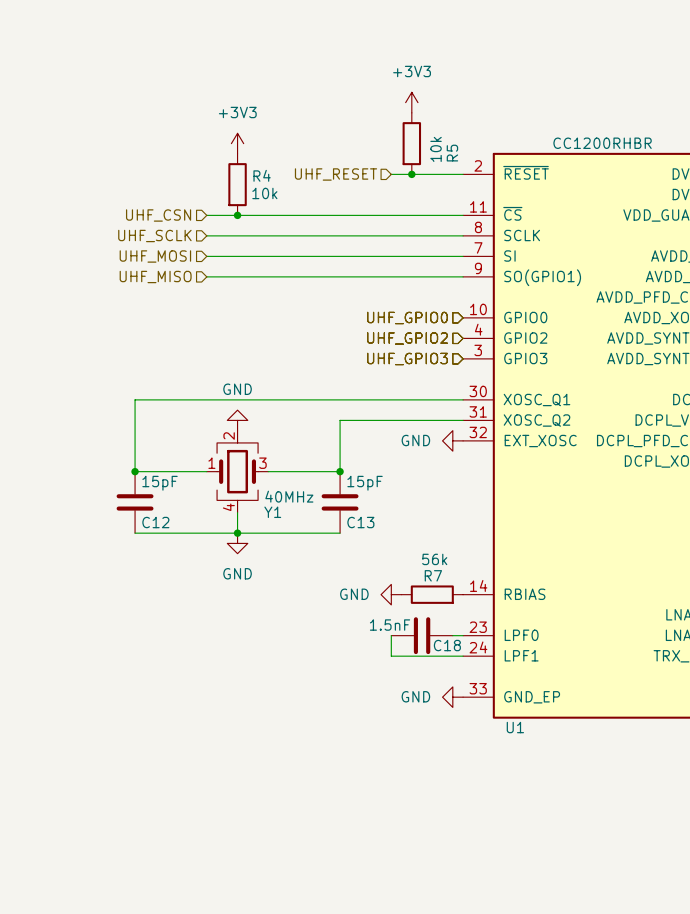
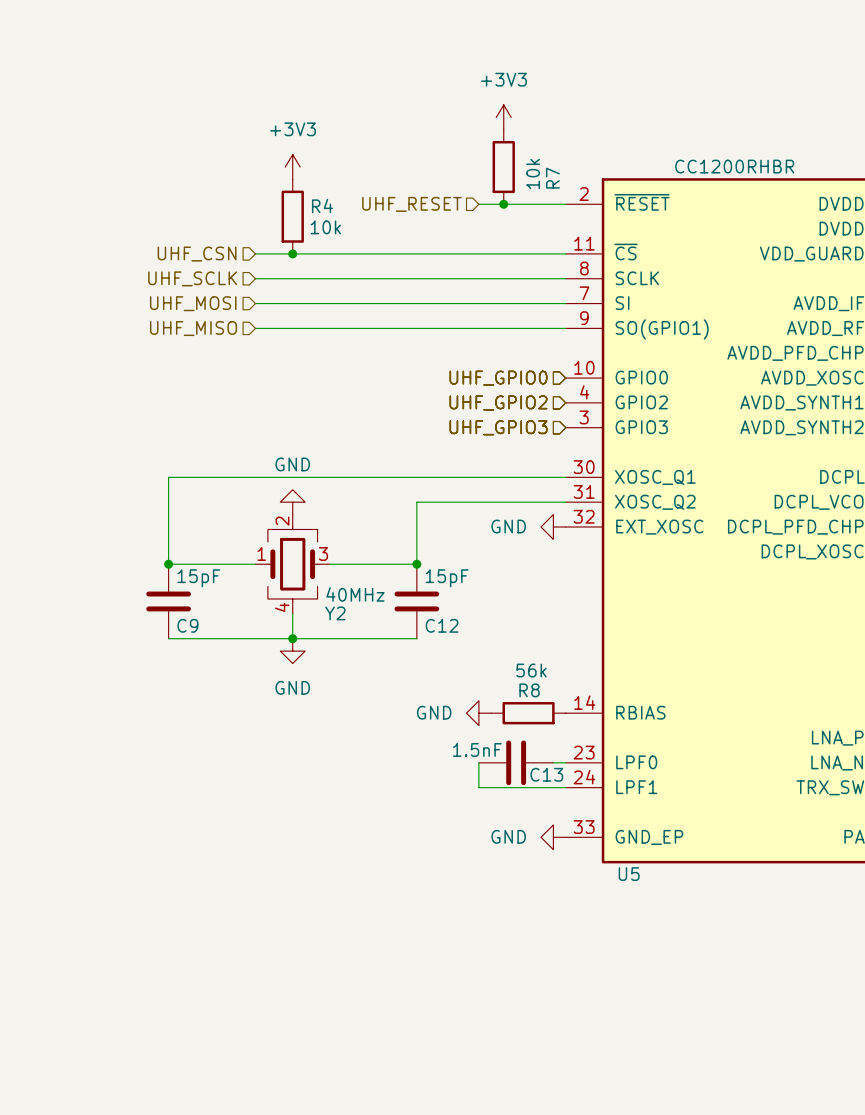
R5 name: R5 (452, 153) -> R7 (552, 178)
Y1 name: Y1 (272, 512) -> Y2 (335, 613)
C12 name: C12 (155, 522) -> C9 (187, 625)
C13 name: C13 (360, 522) -> C12 (442, 625)
R7 name: R7 (433, 575) -> R8 (529, 690)
C18 name: C18 (447, 645) -> C13 (546, 774)
U1 name: U1 (515, 727) -> U5 (629, 874)

